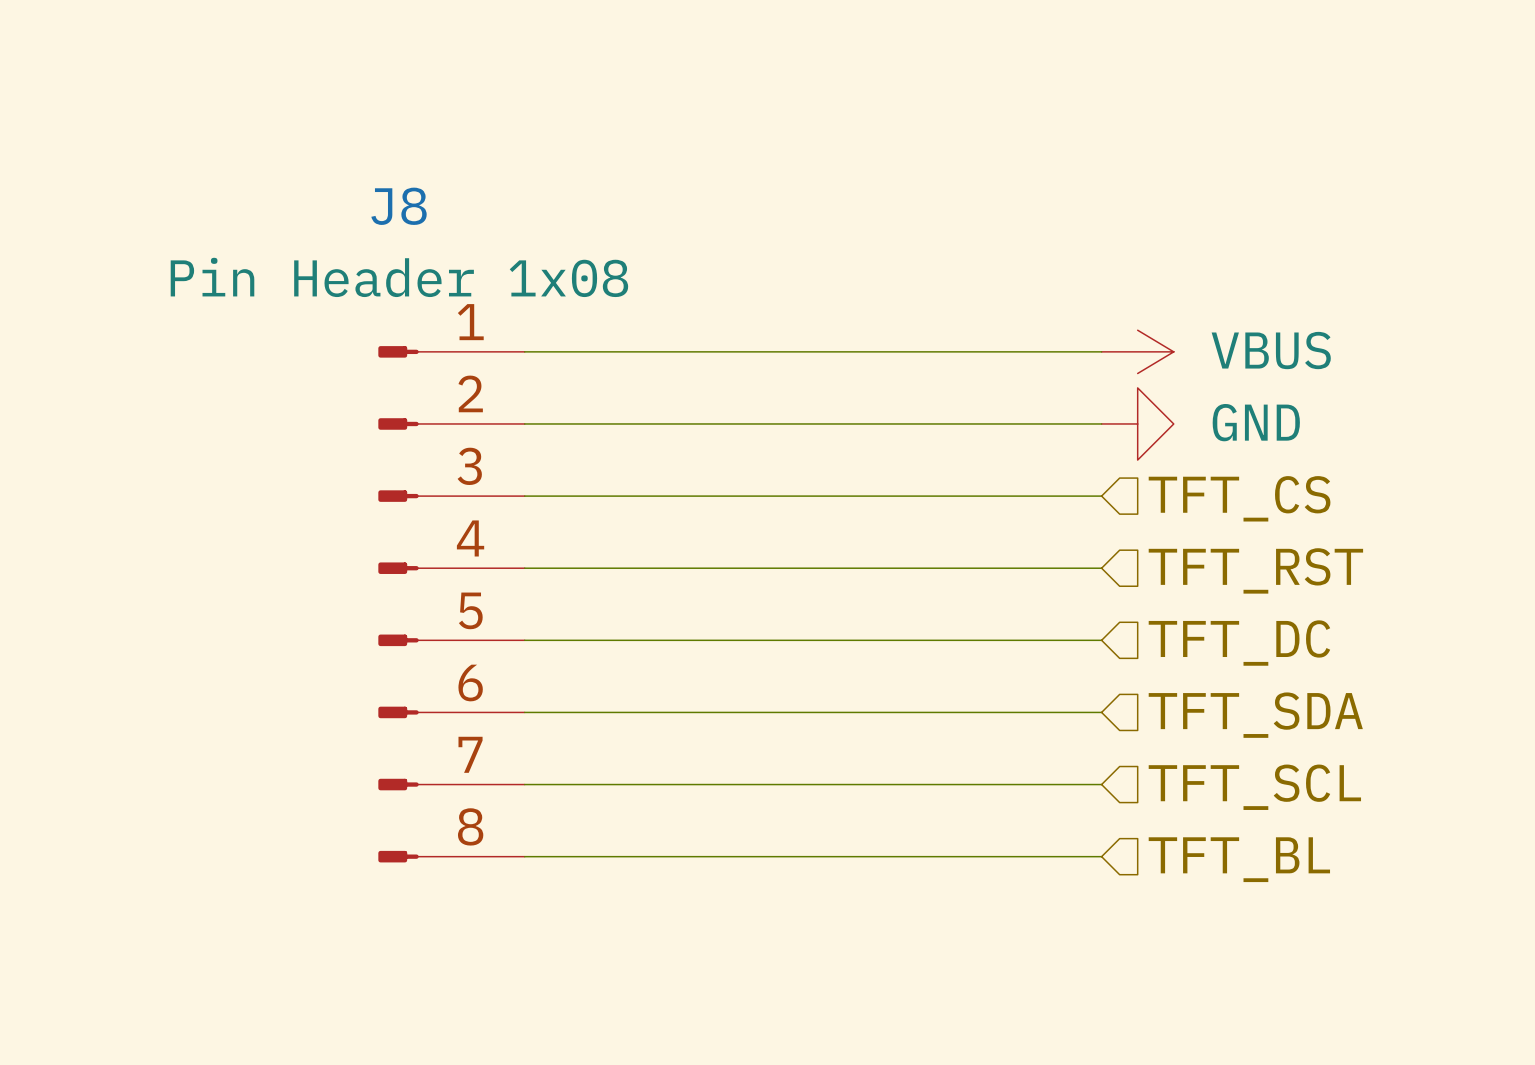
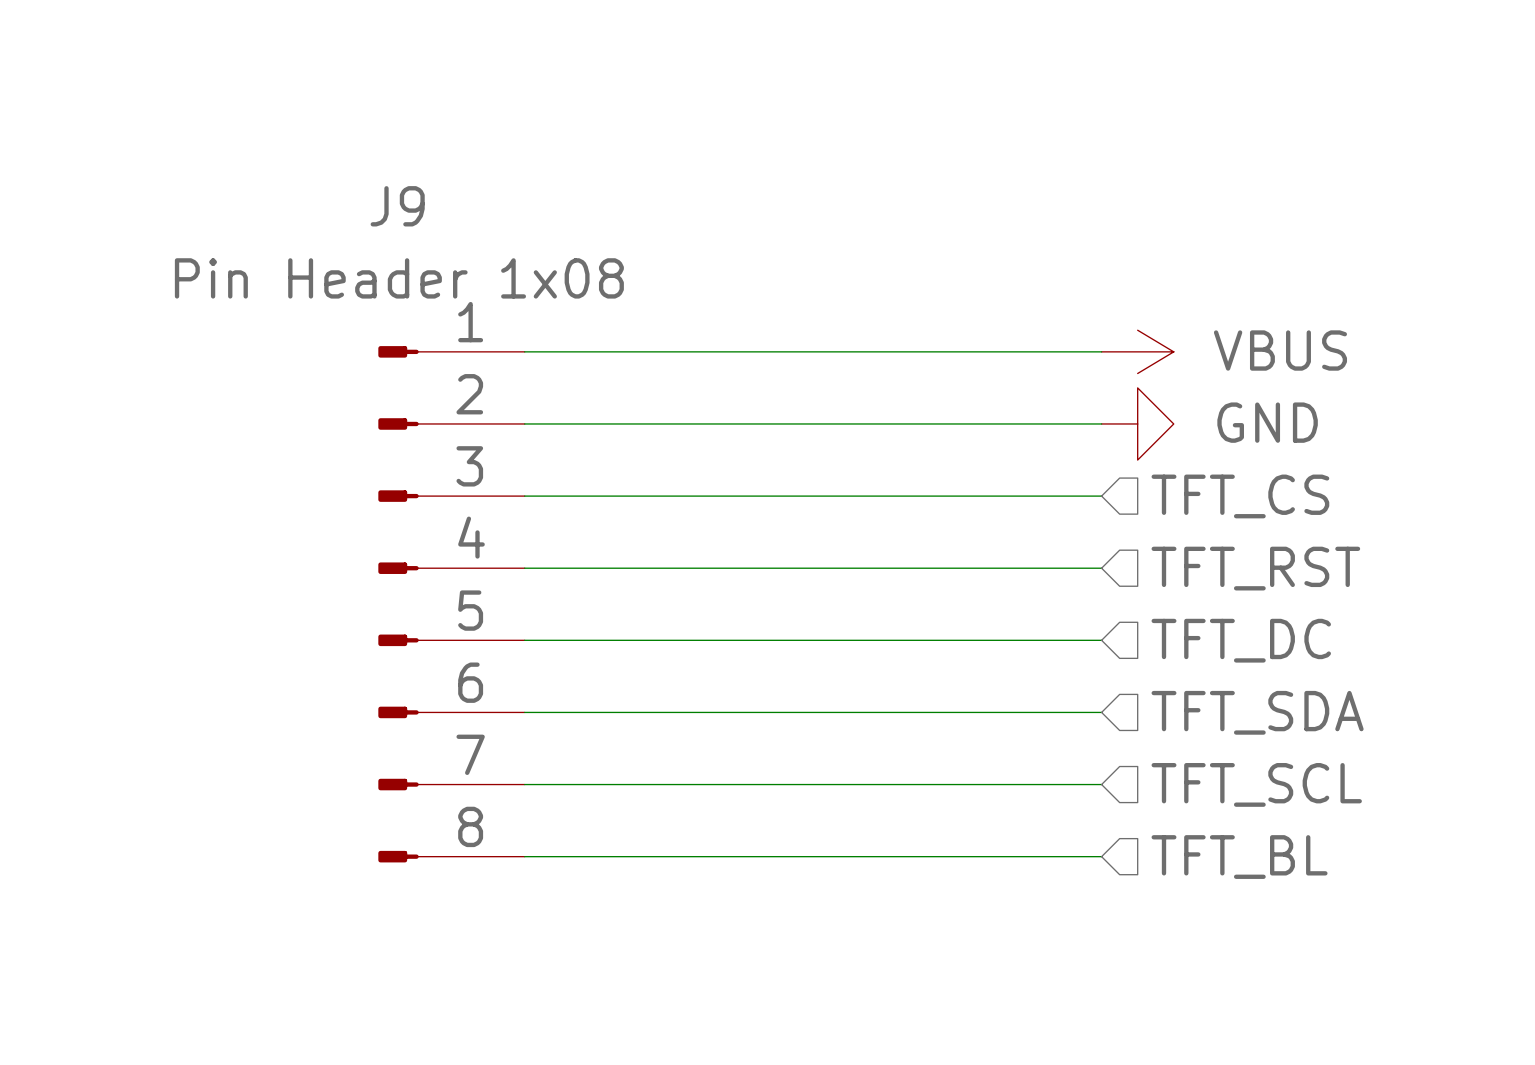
J8 name: J8 (399, 206) -> J9 (397, 206)

